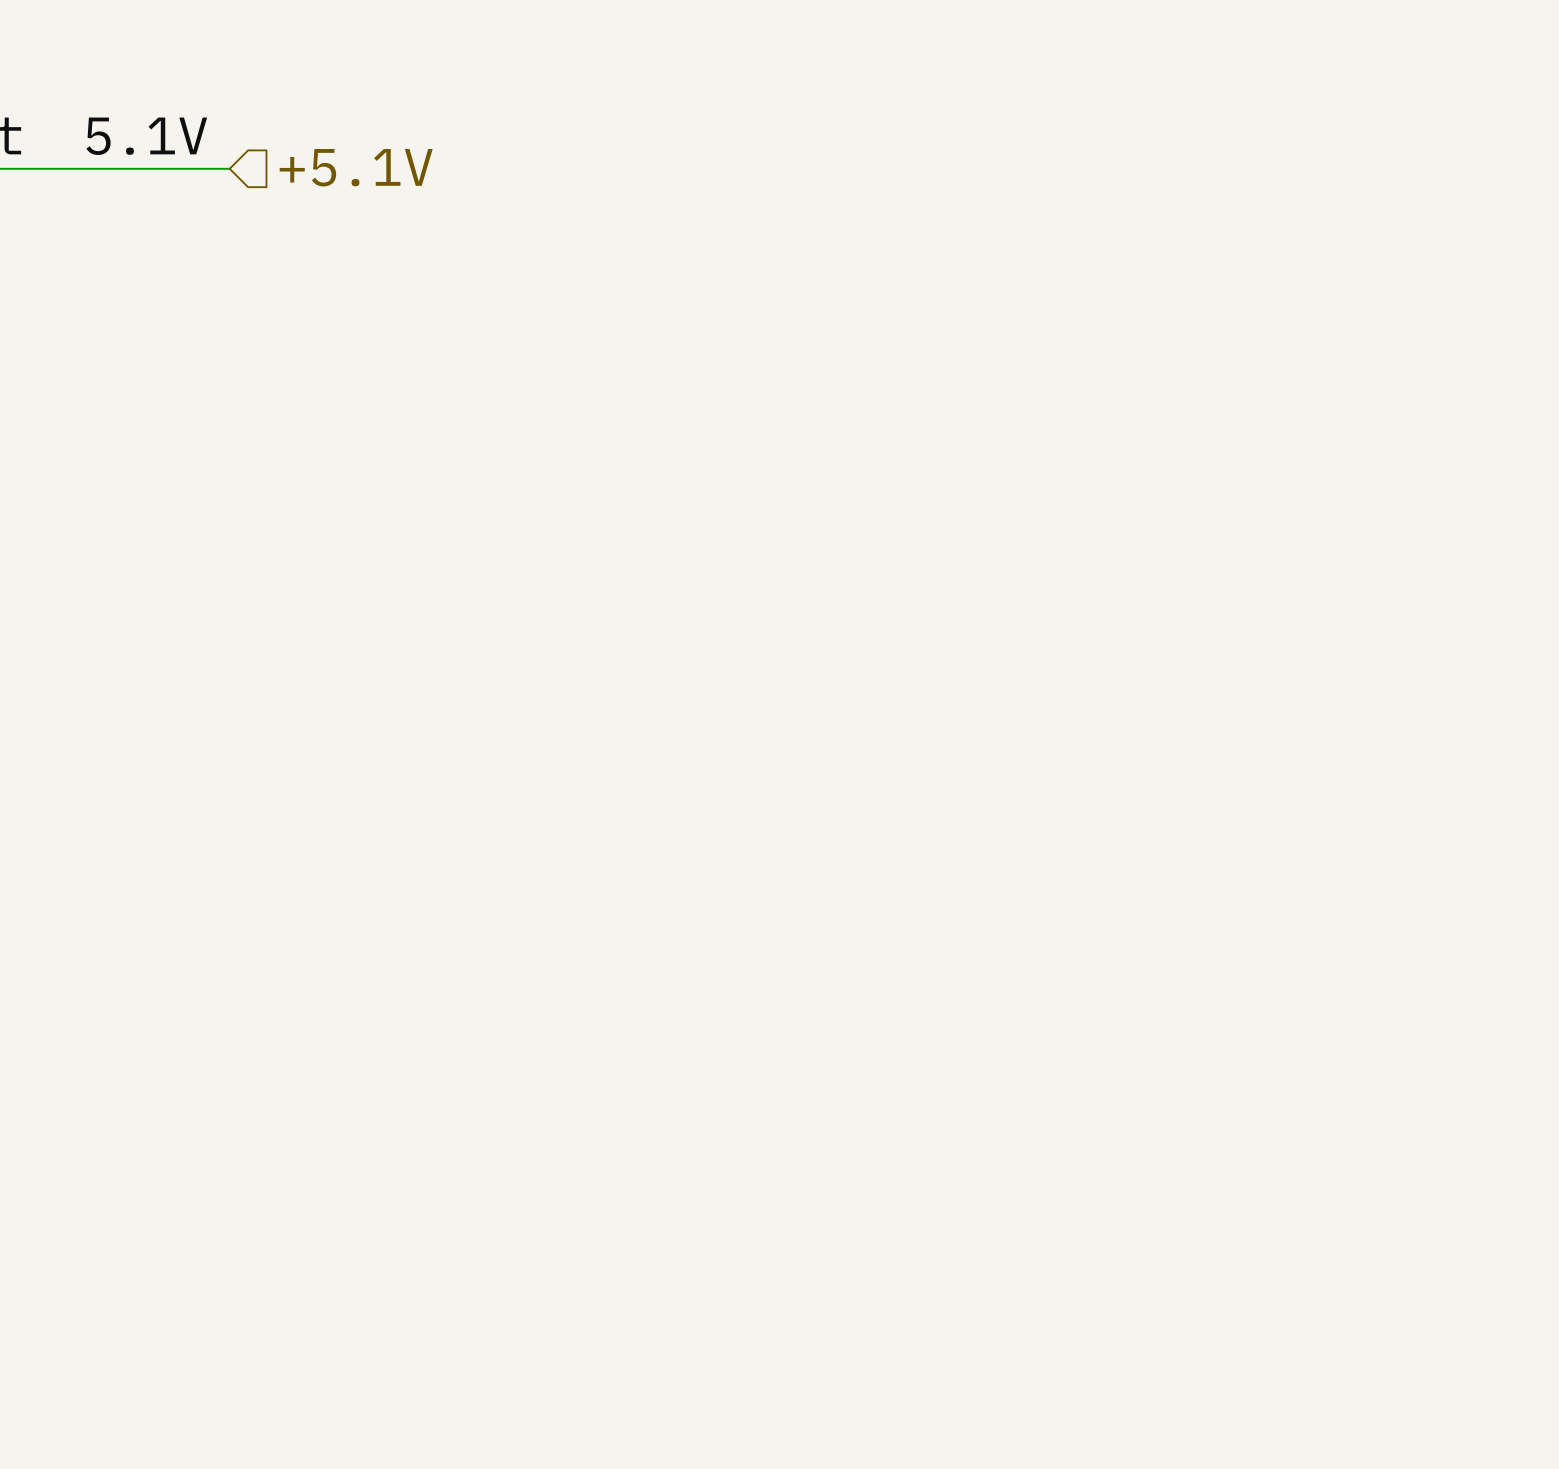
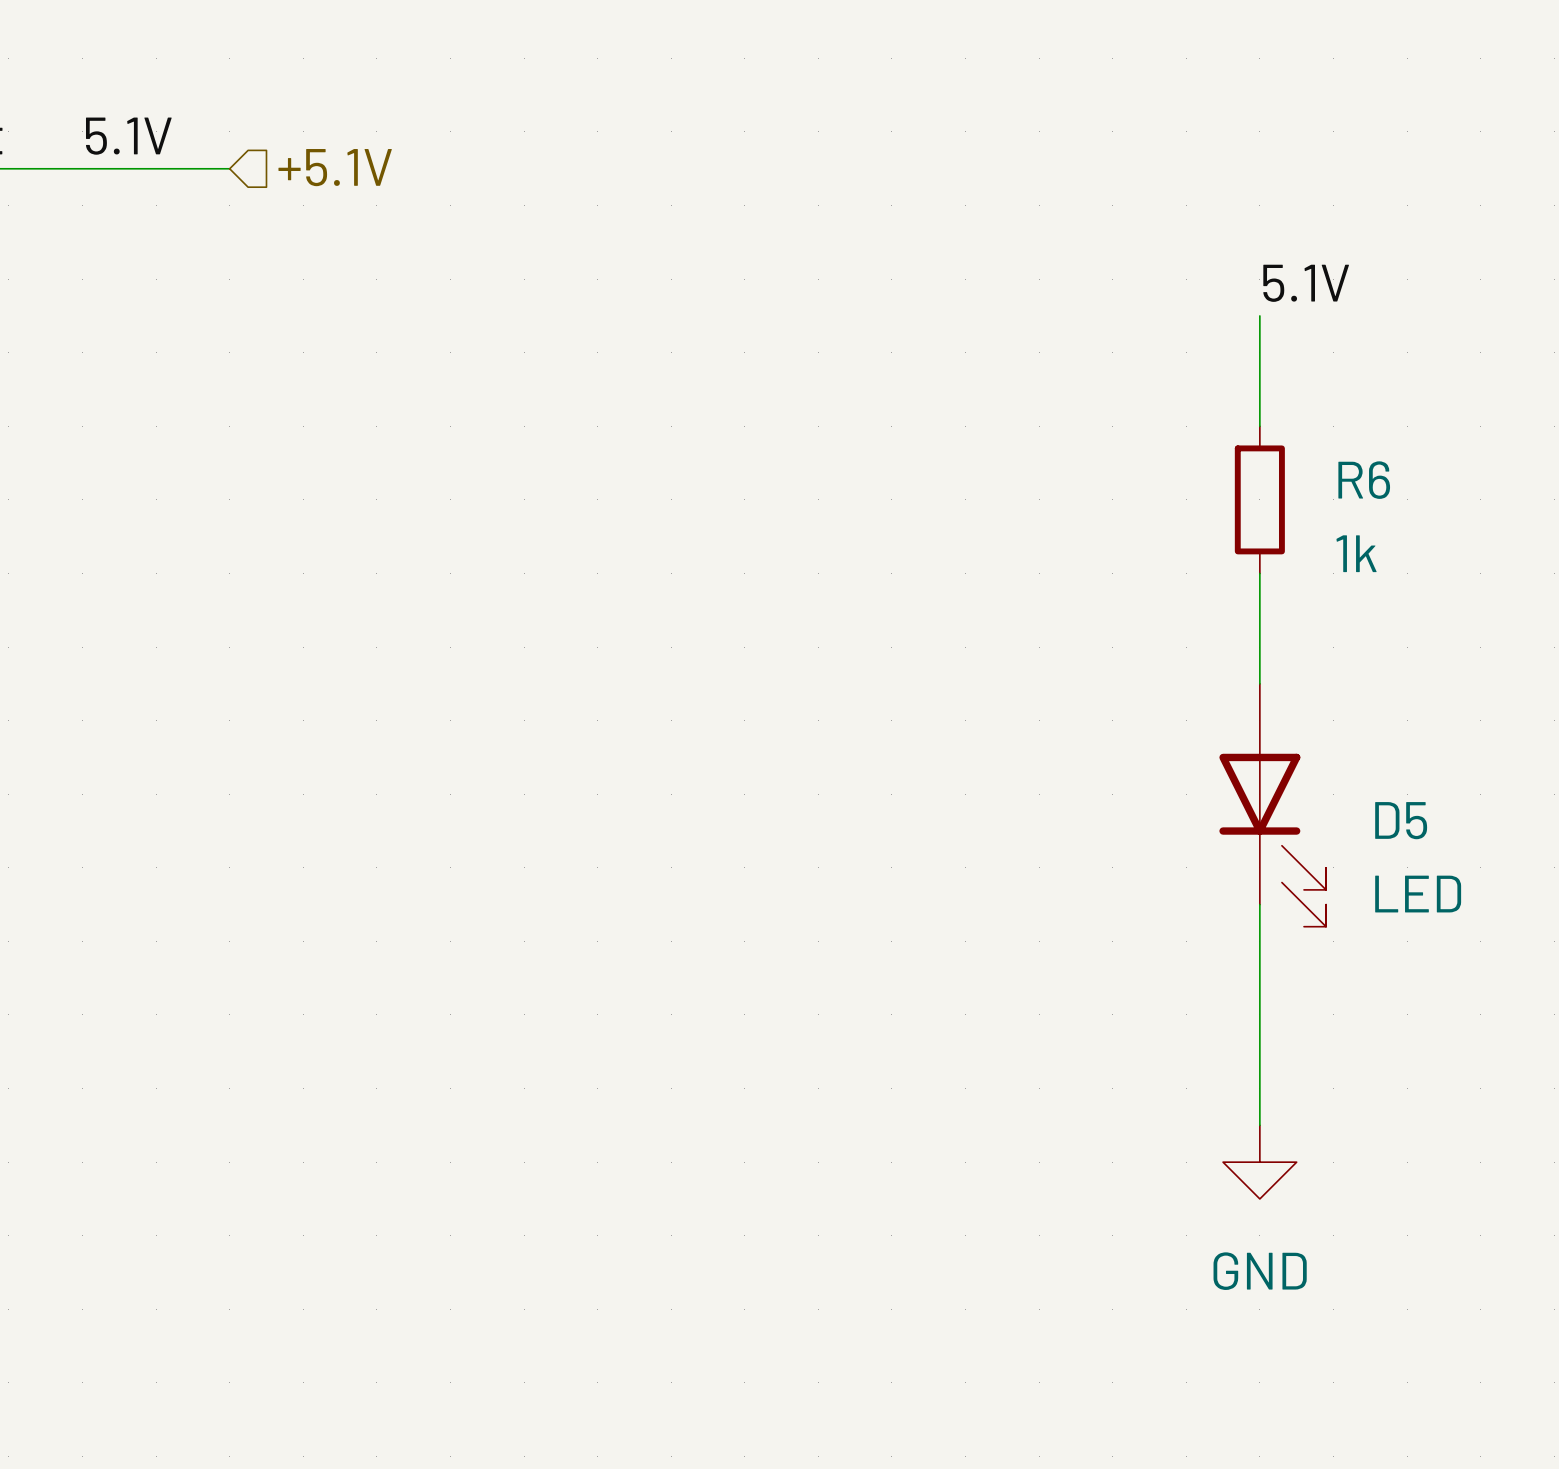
label: none -> 5.1V (1306, 283)
wire: none -> (1259, 315) (1259, 426)
R6: none -> 1k (1259, 499)
wire: none -> (1259, 573) (1259, 683)
D5: none -> LED (1272, 805)
wire: none -> (1259, 904) (1259, 1125)
power symbol: none -> GND (1259, 1162)

